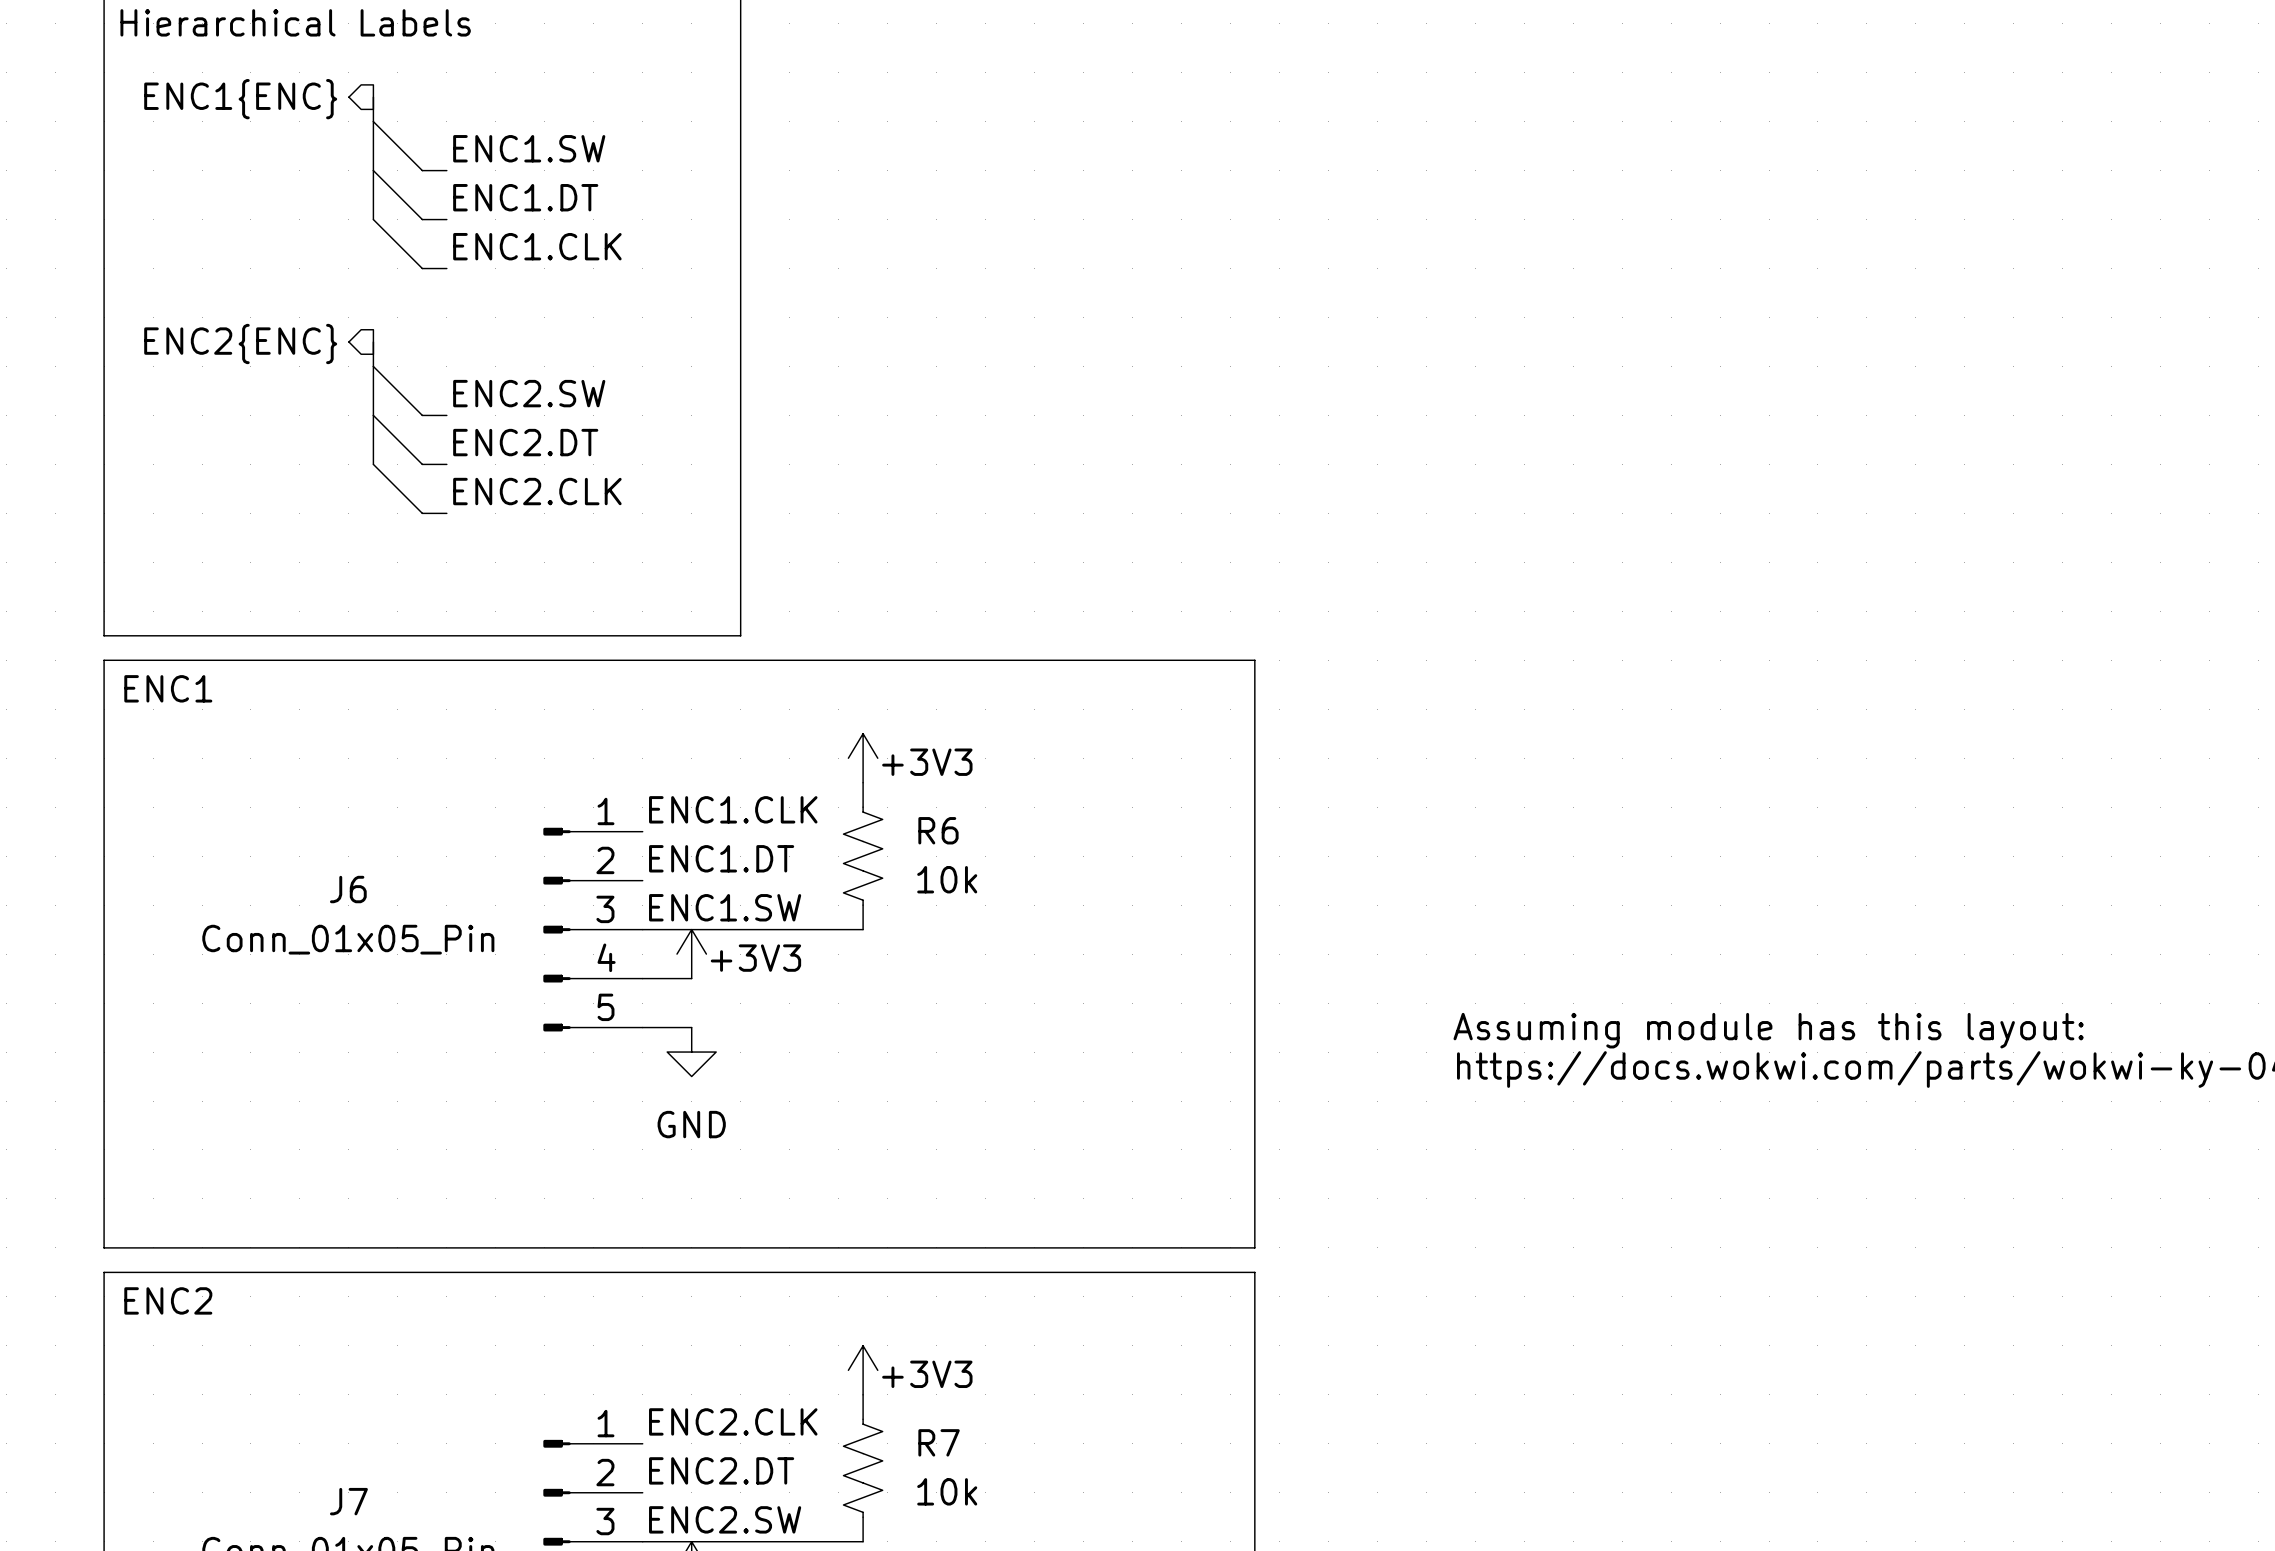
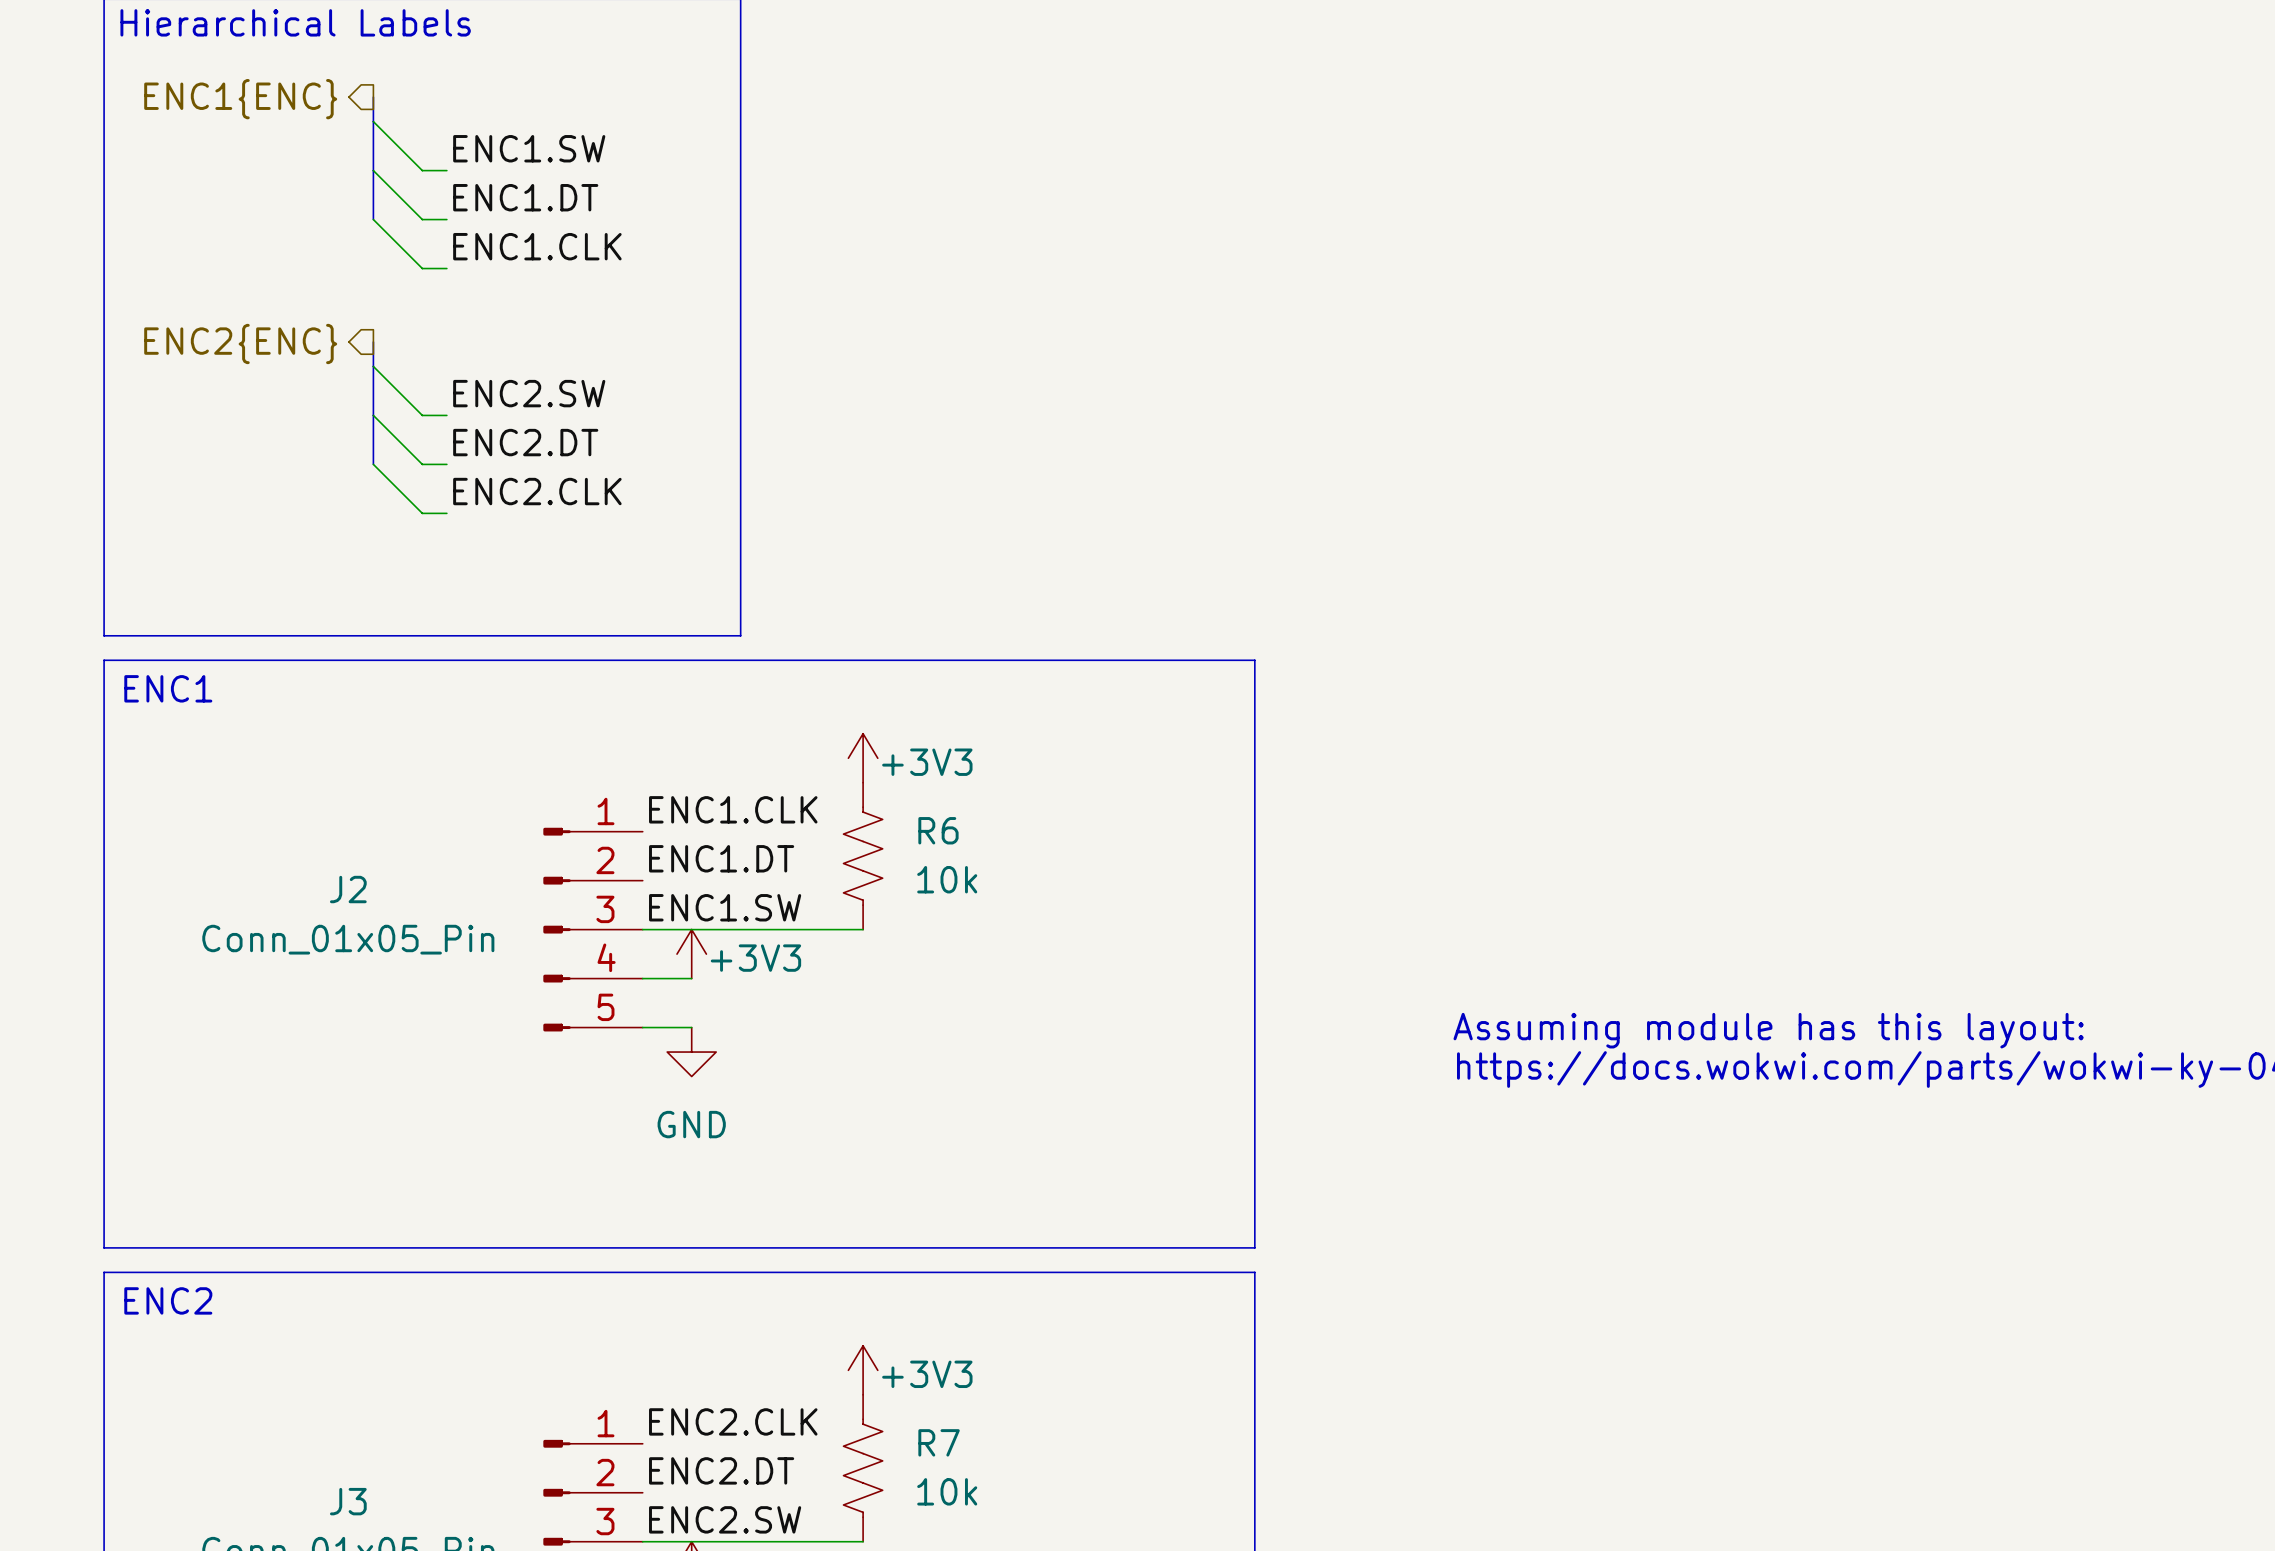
J6 name: J6 (348, 889) -> J2 (348, 889)
J7 name: J7 (348, 1501) -> J3 (348, 1501)

